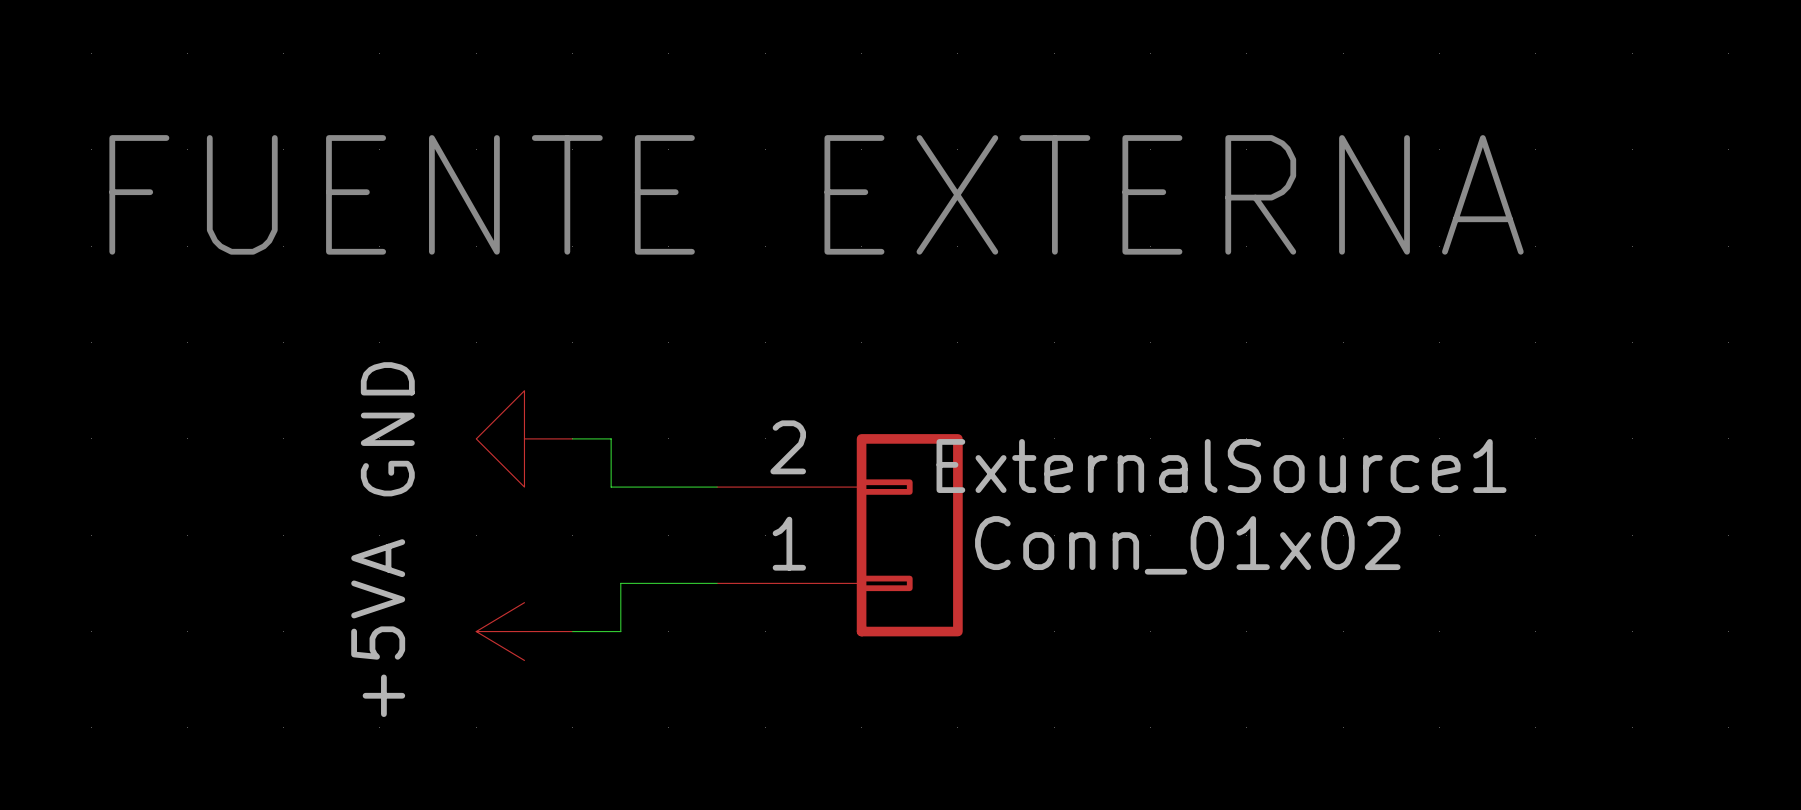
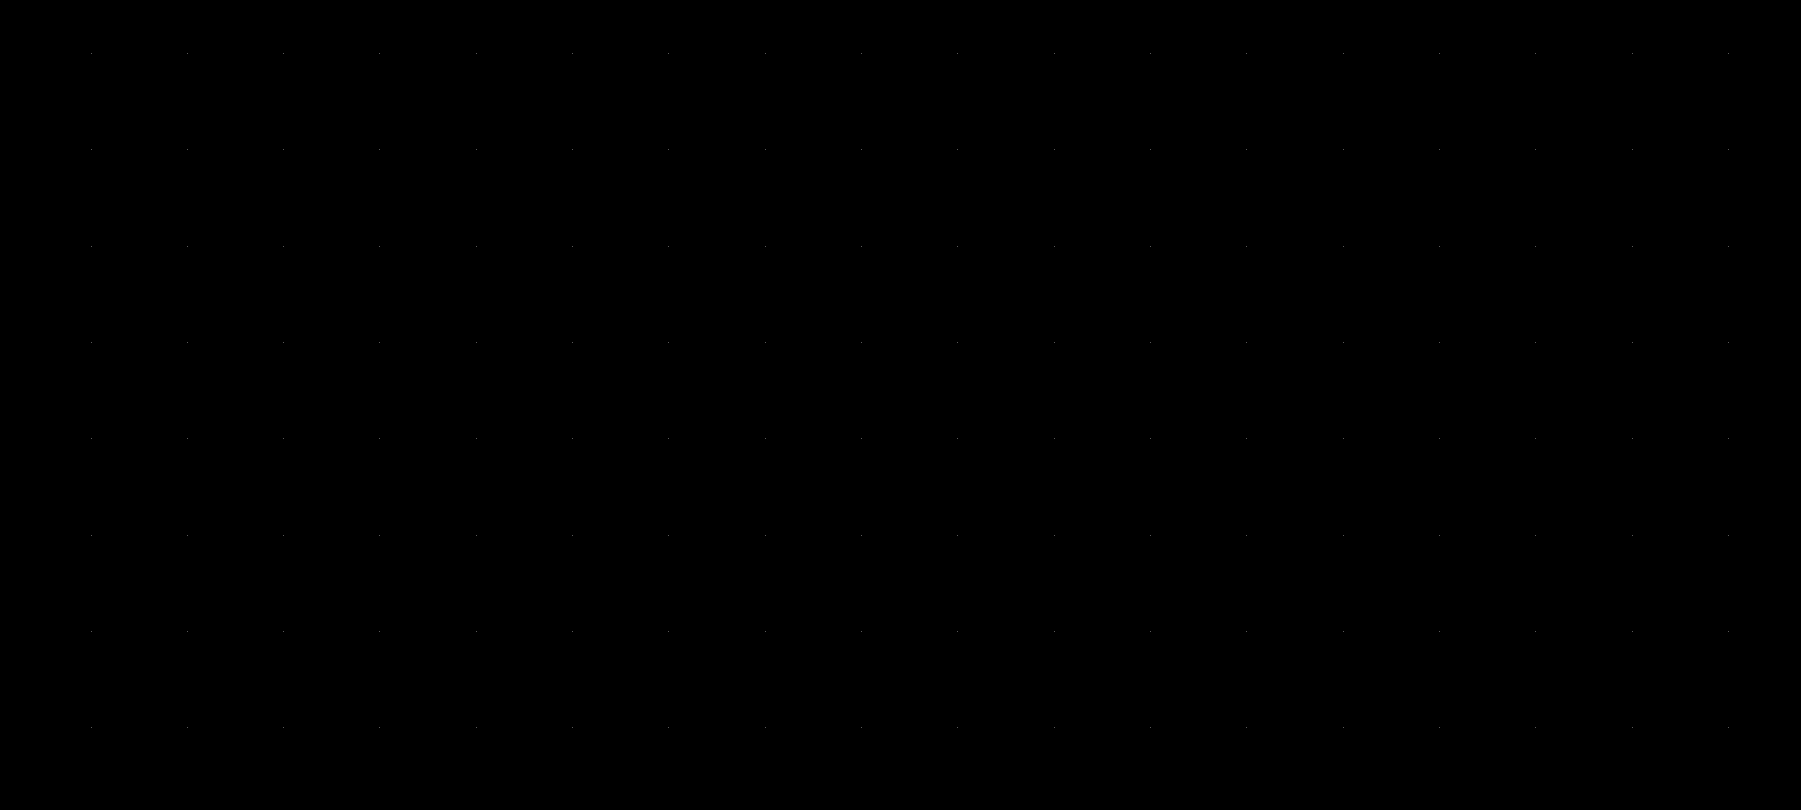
text: FUENTE EXTERNA (816, 194) -> none
power symbol: GND (524, 438) -> none
wire: (572, 438) (611, 438) (611, 487) (717, 487) -> none
ExternalSource1: Conn_01x02 (839, 535) -> none
wire: (717, 583) (620, 583) (620, 631) (572, 631) -> none
power symbol: +5VA (524, 631) -> none

